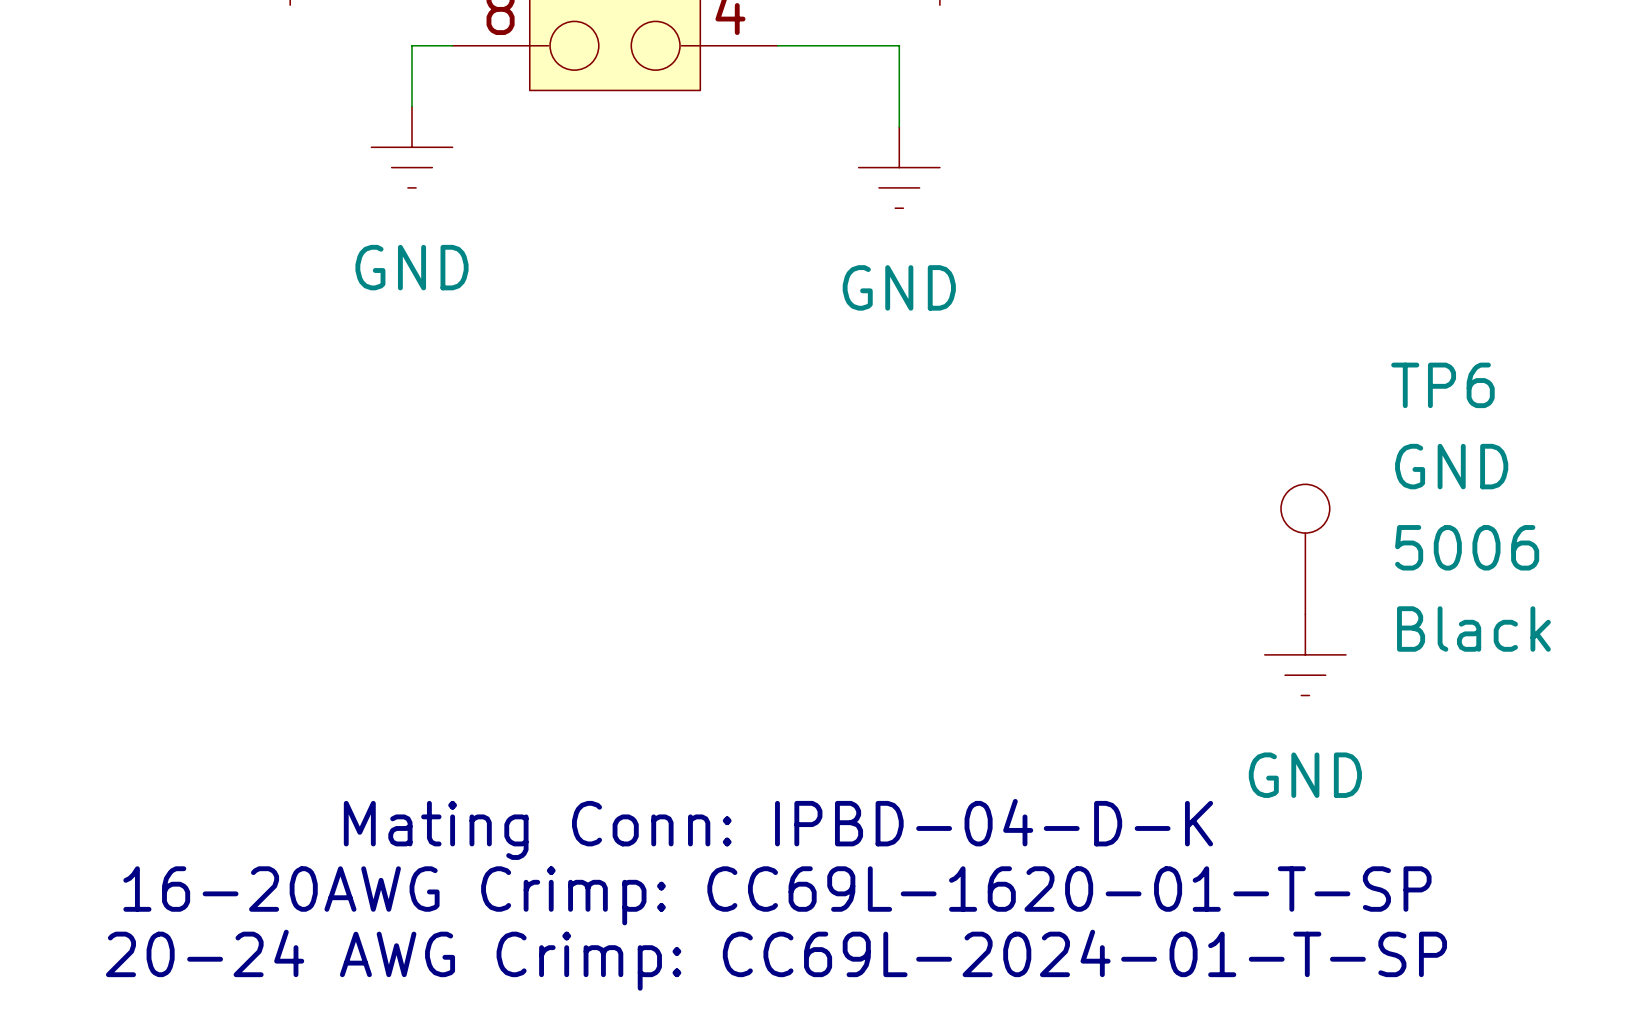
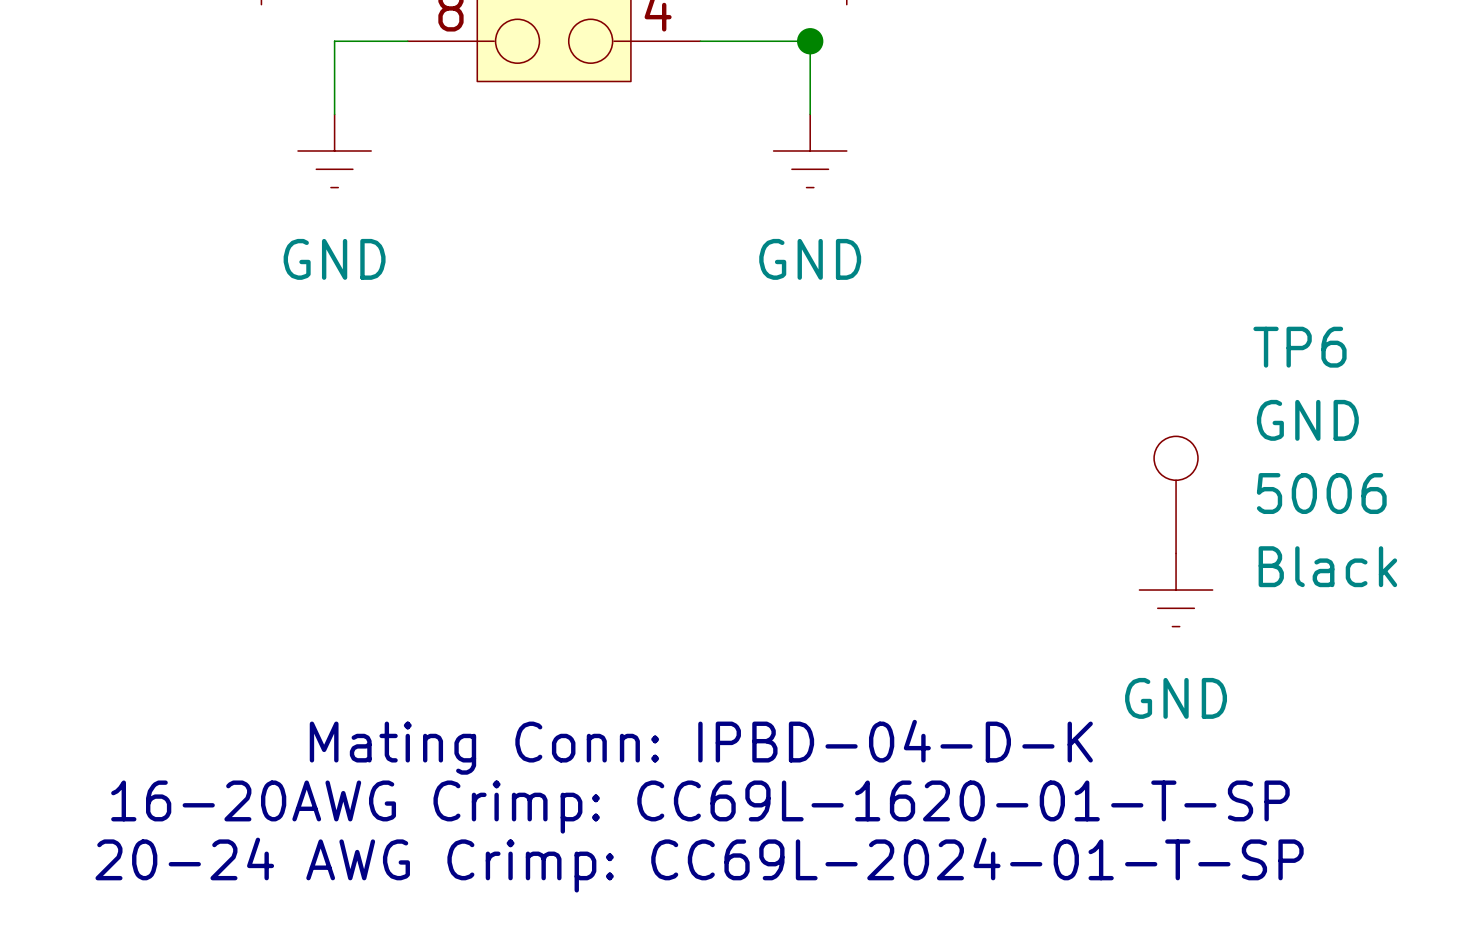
wire: (412, 45) (412, 106) -> (371, 41) (334, 41) (334, 114)
junction: none -> (810, 41)
power symbol position: GND (412, 147) -> GND (334, 150)

